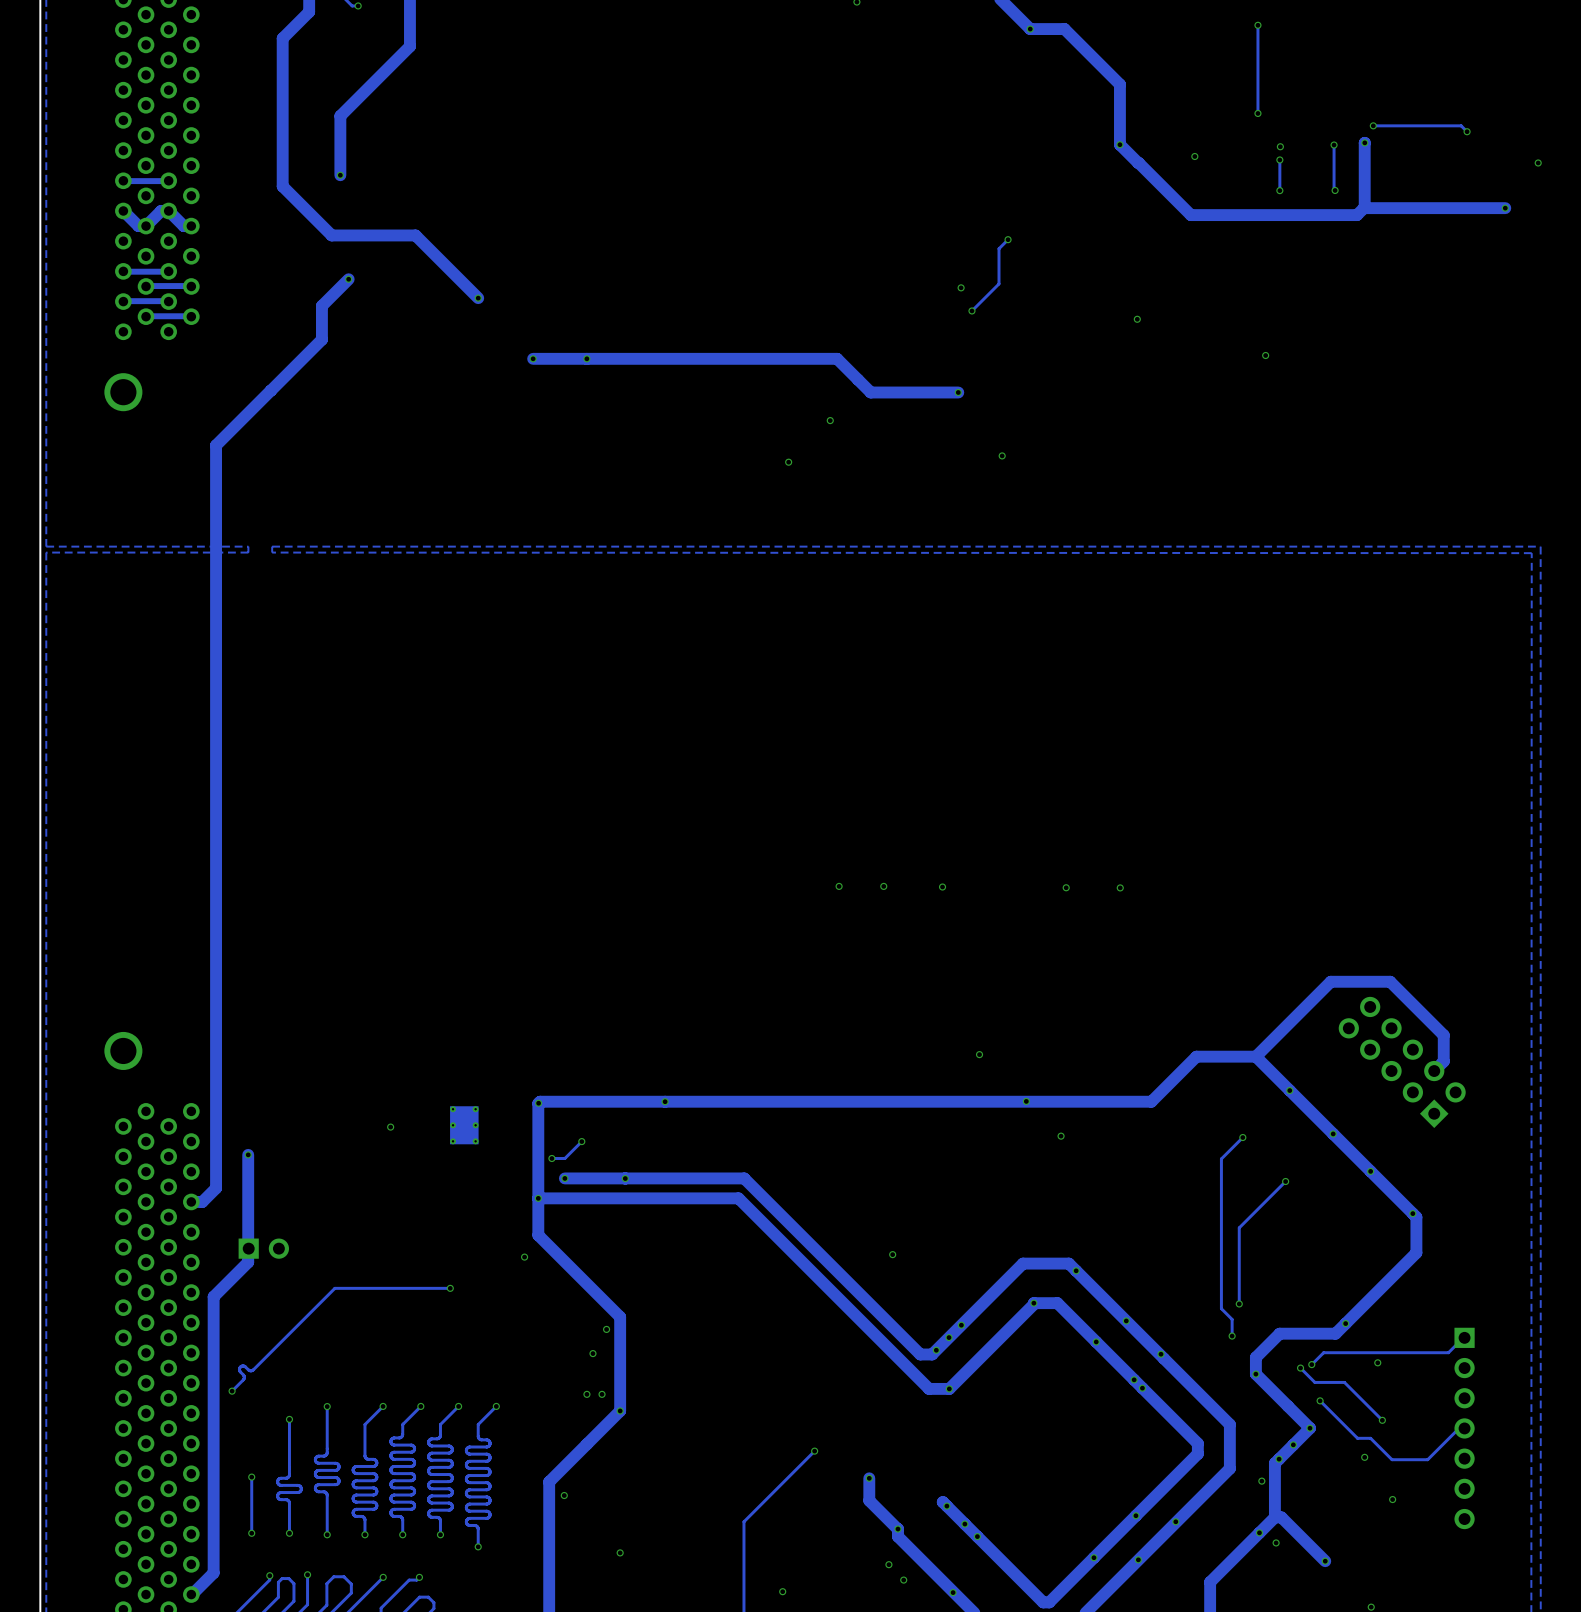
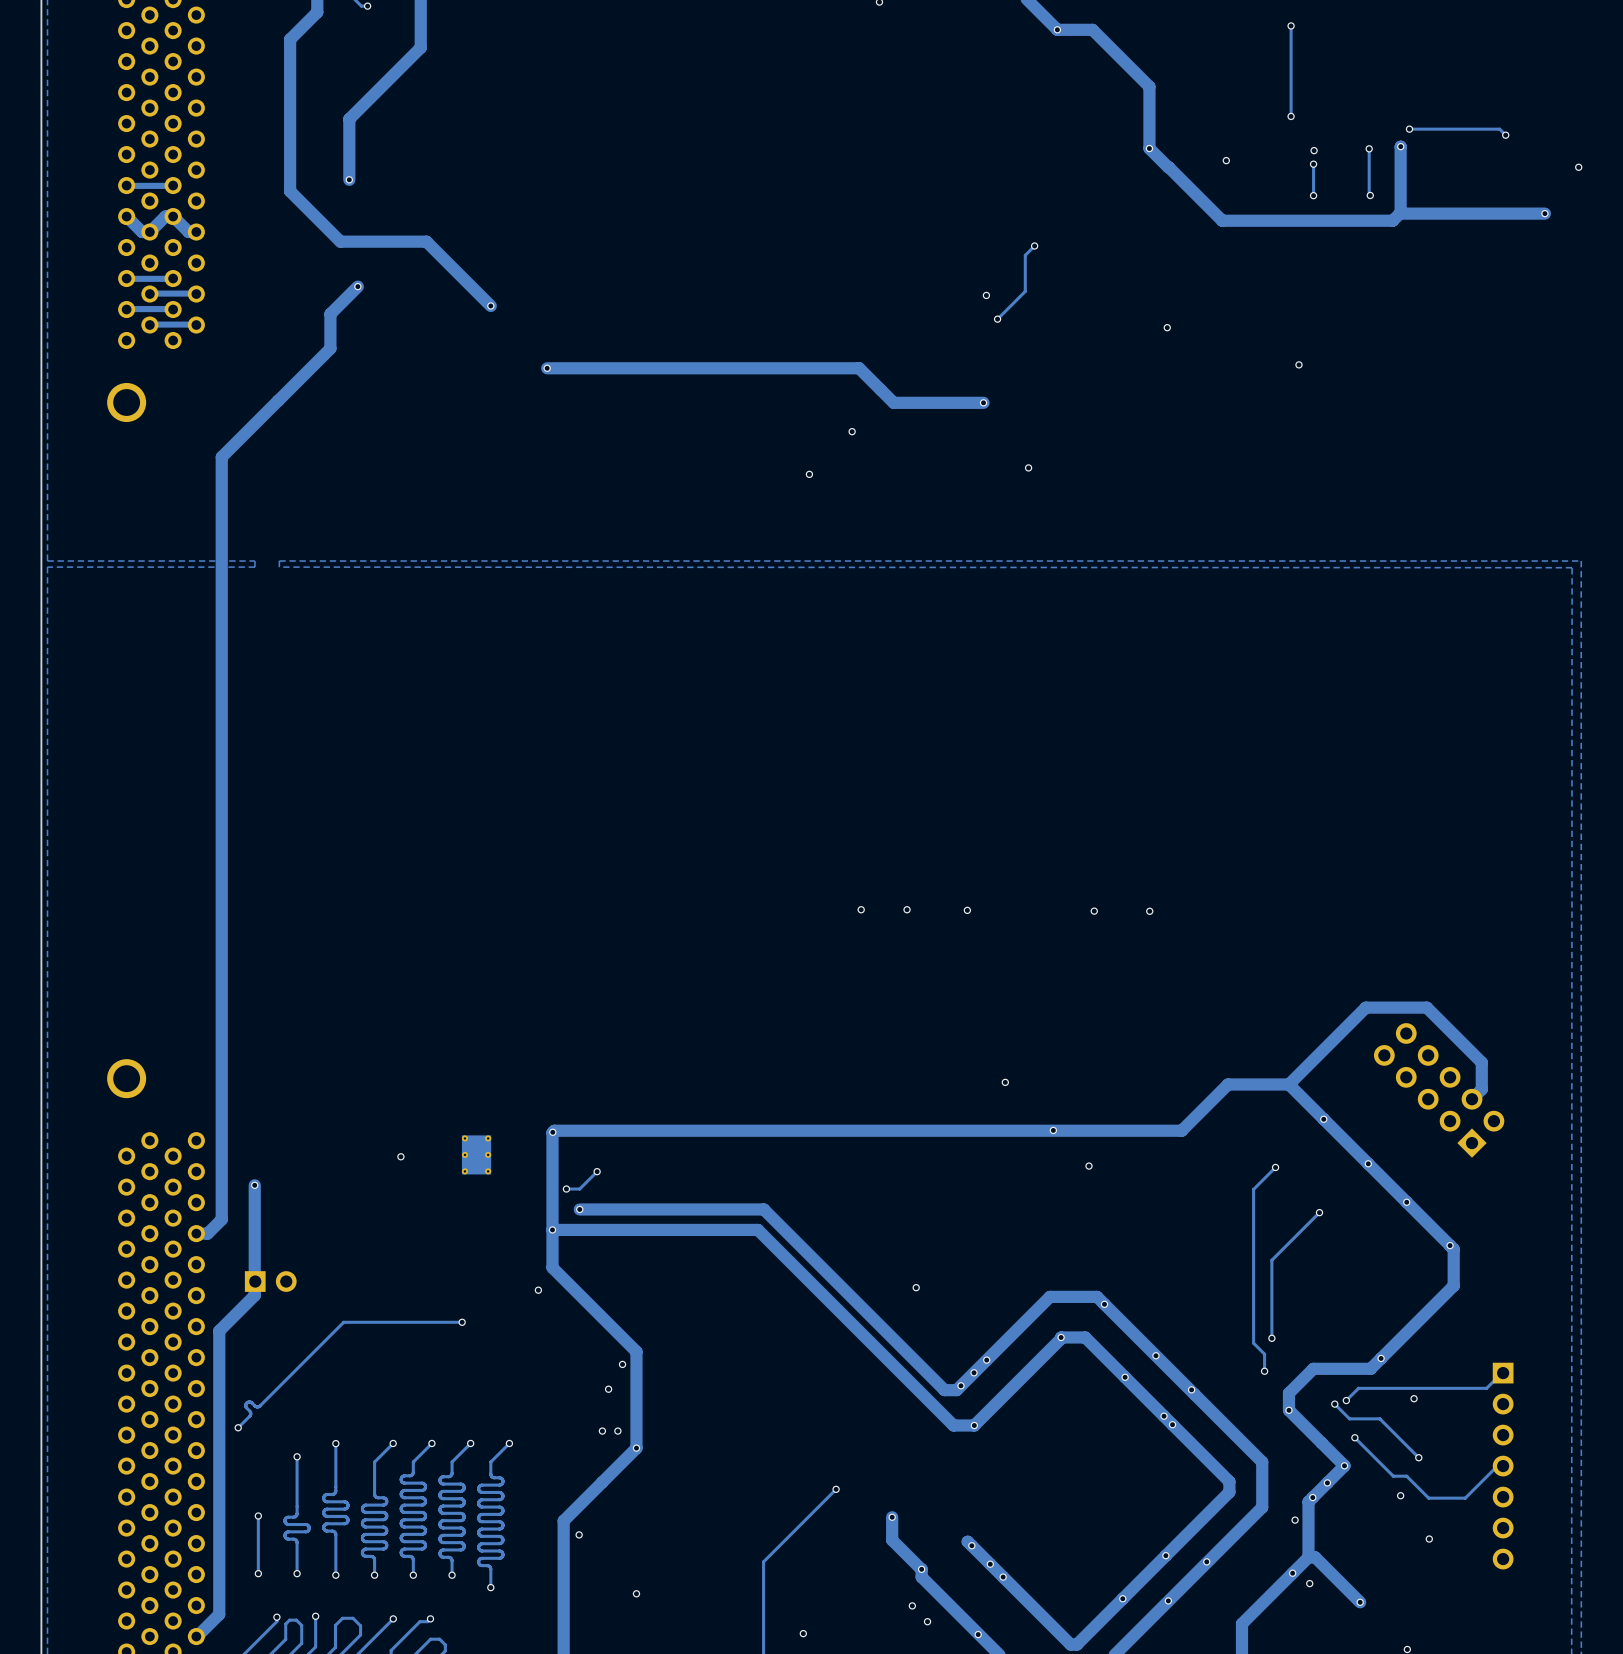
via: (586, 358) -> none
via: (665, 1101) -> none
via: (625, 1178) -> none

